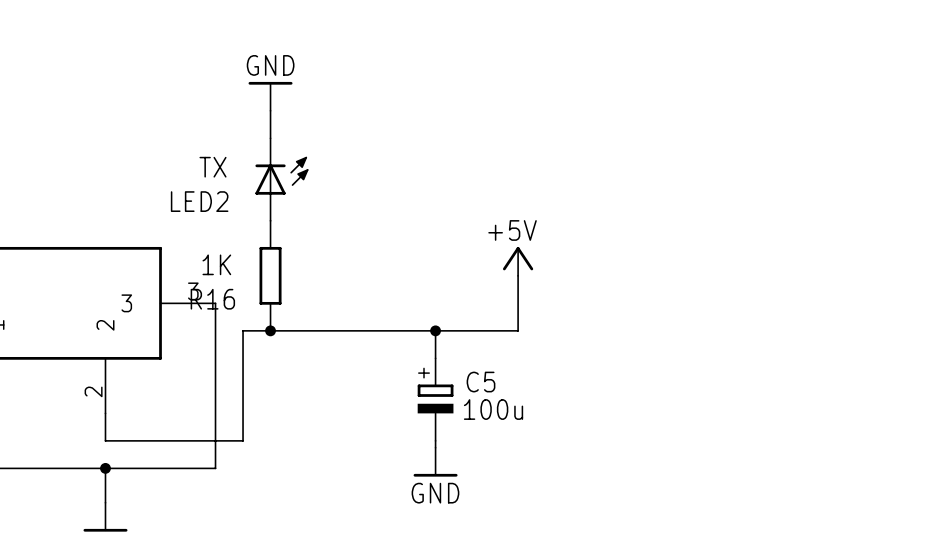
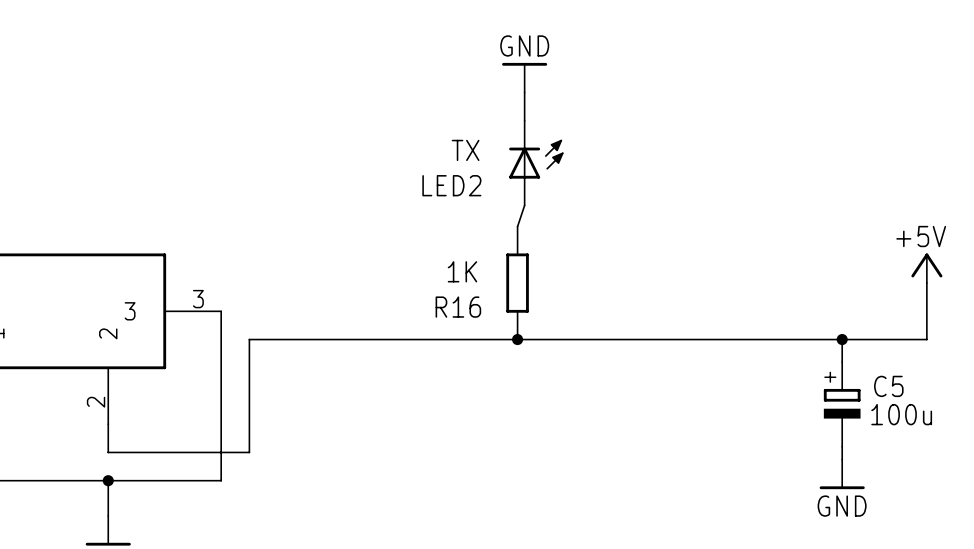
power symbol: none -> GND (524, 77)
power symbol: GND (270, 96) -> none
wire: (270, 110) (270, 138) -> (524, 92) (524, 120)
LED2 position: (281, 179) -> (536, 163)
wire: none -> (524, 205) (517, 226)
power symbol: +5V (518, 261) -> none
power symbol: none -> +5V (926, 268)
R16 position: (270, 275) -> (517, 283)
wire: (518, 275) (518, 330) -> (926, 283) (926, 339) (531, 339)
junction: (270, 330) -> none
wire: (435, 330) (435, 358) -> none
junction: (435, 330) -> none
junction: none -> (517, 339)
wire: none -> (842, 339) (842, 362)
junction: none -> (842, 339)
C5 position: (435, 399) -> (842, 404)
wire: none -> (842, 446) (842, 459)
wire: (435, 440) (435, 447) -> none
power symbol: GND (435, 462) -> none
power symbol: none -> GND (842, 474)

